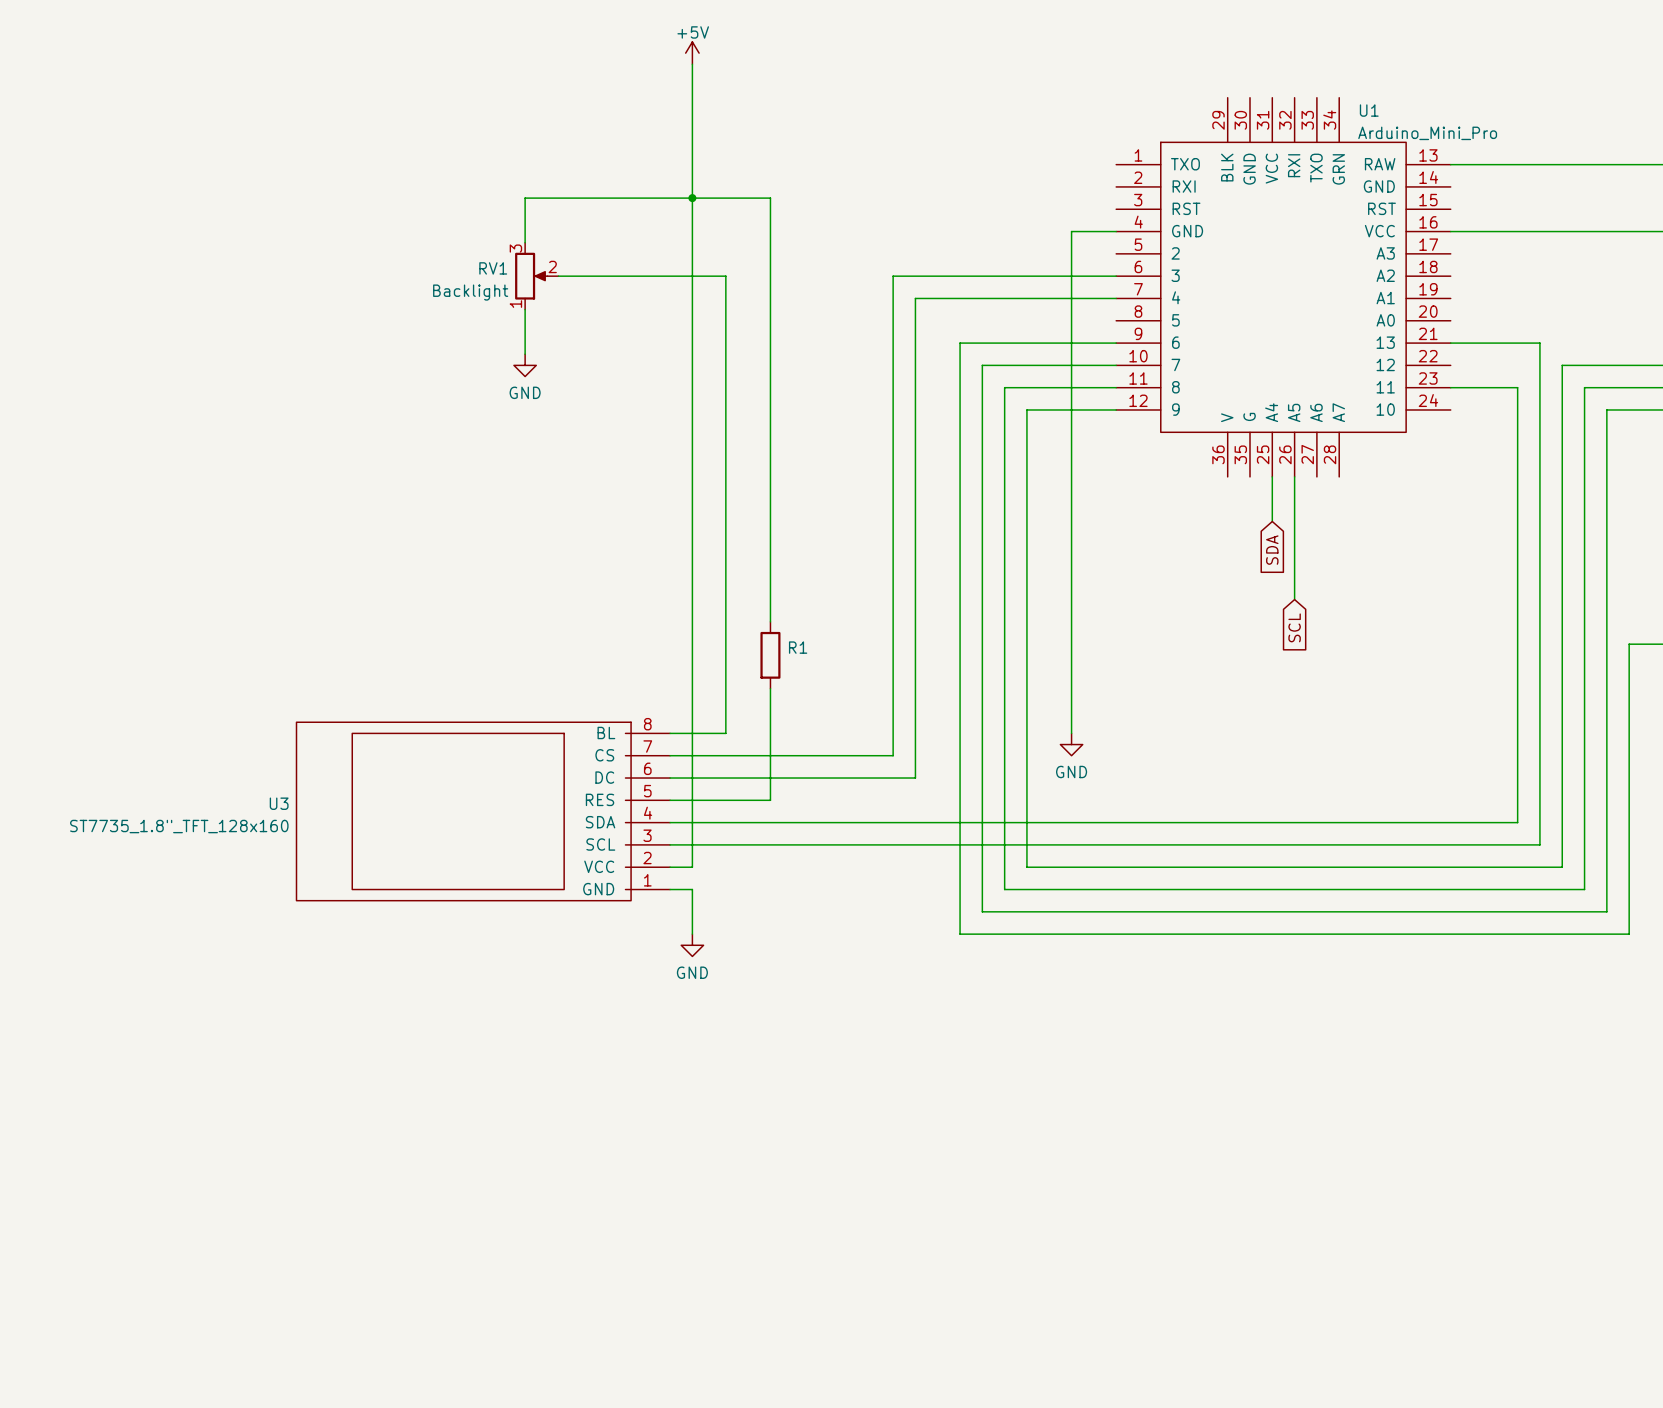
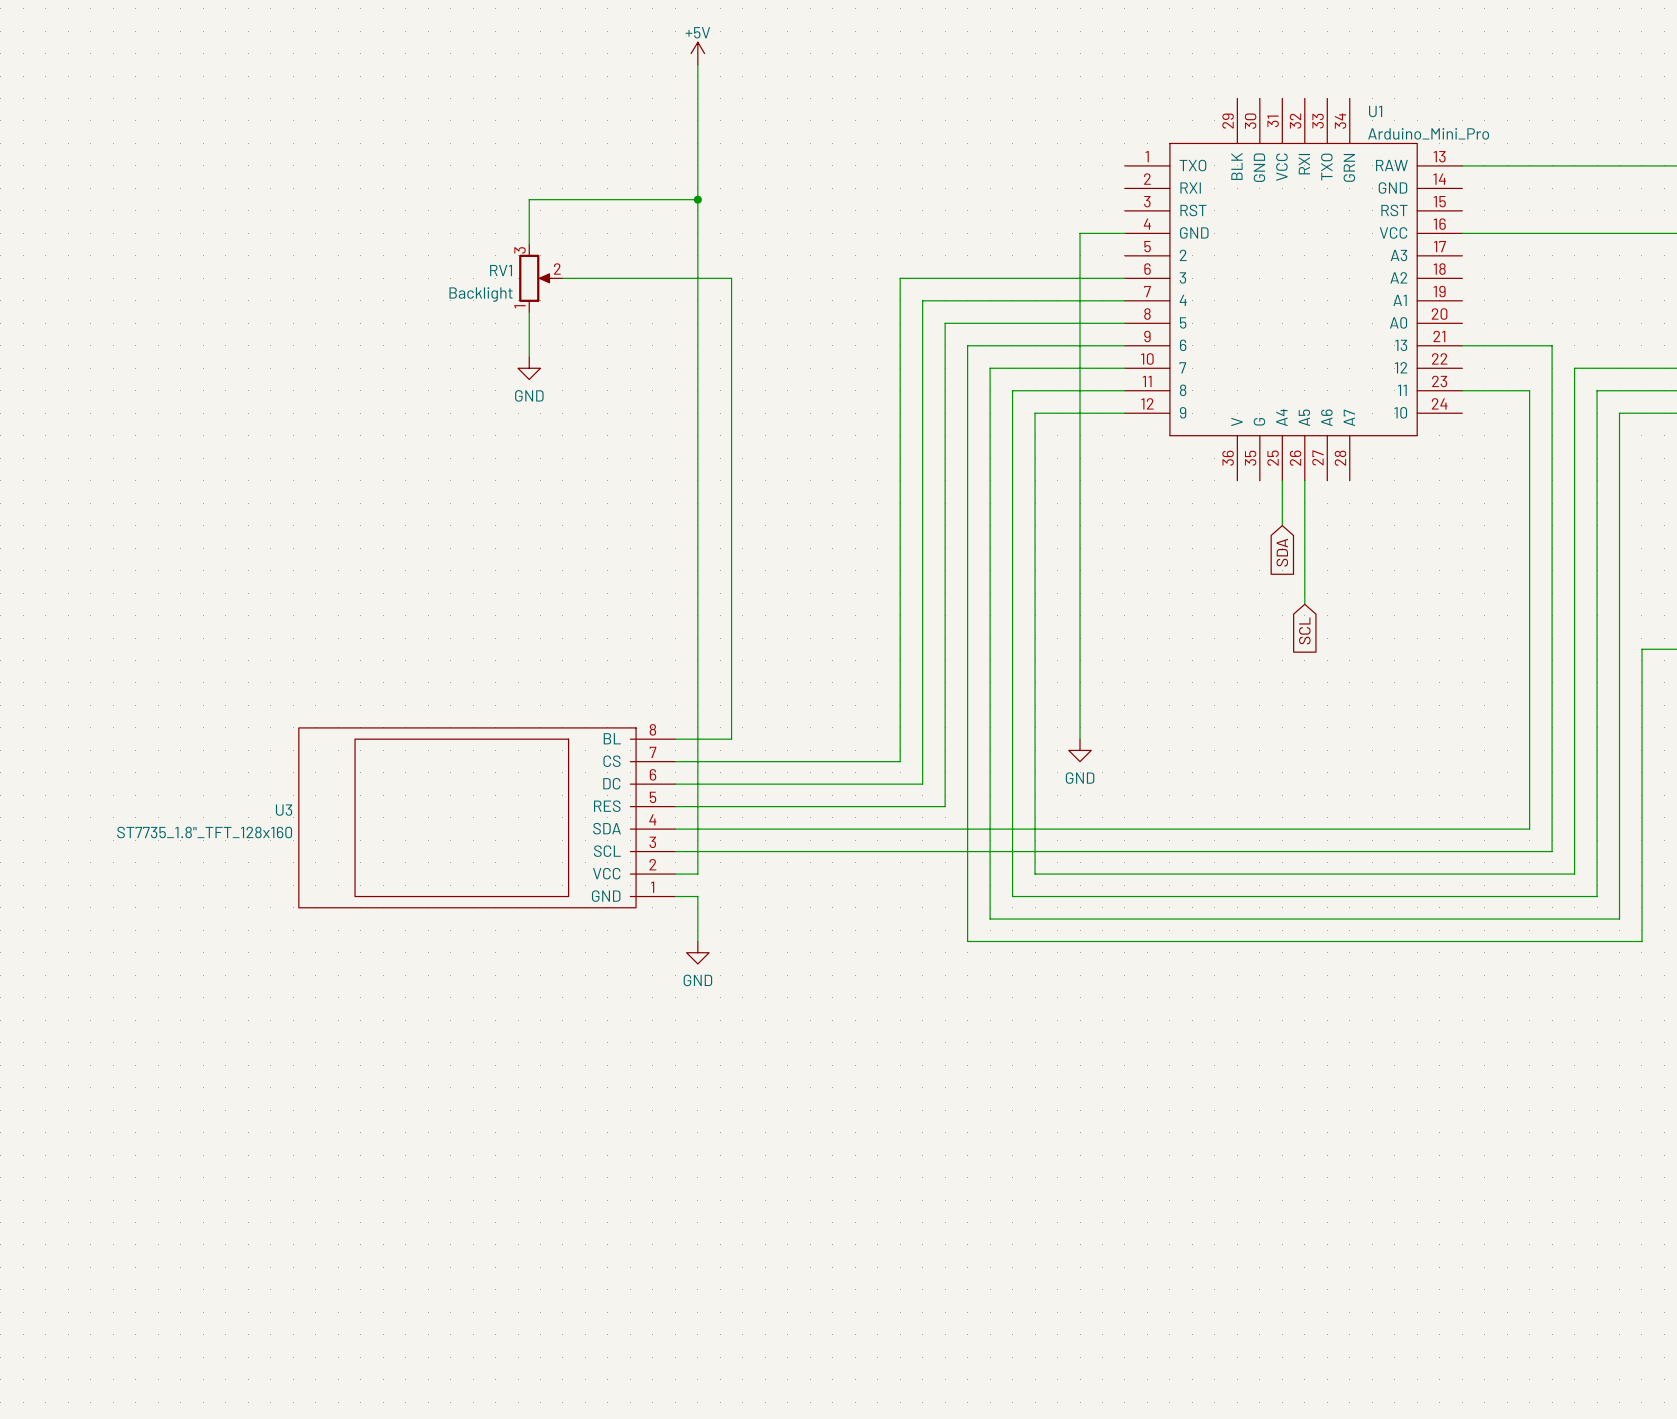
wire: (692, 198) (770, 198) (770, 621) -> none
R1: (770, 655) -> none
wire: (770, 688) (770, 800) -> (1124, 323) (945, 323) (945, 806) (776, 806)

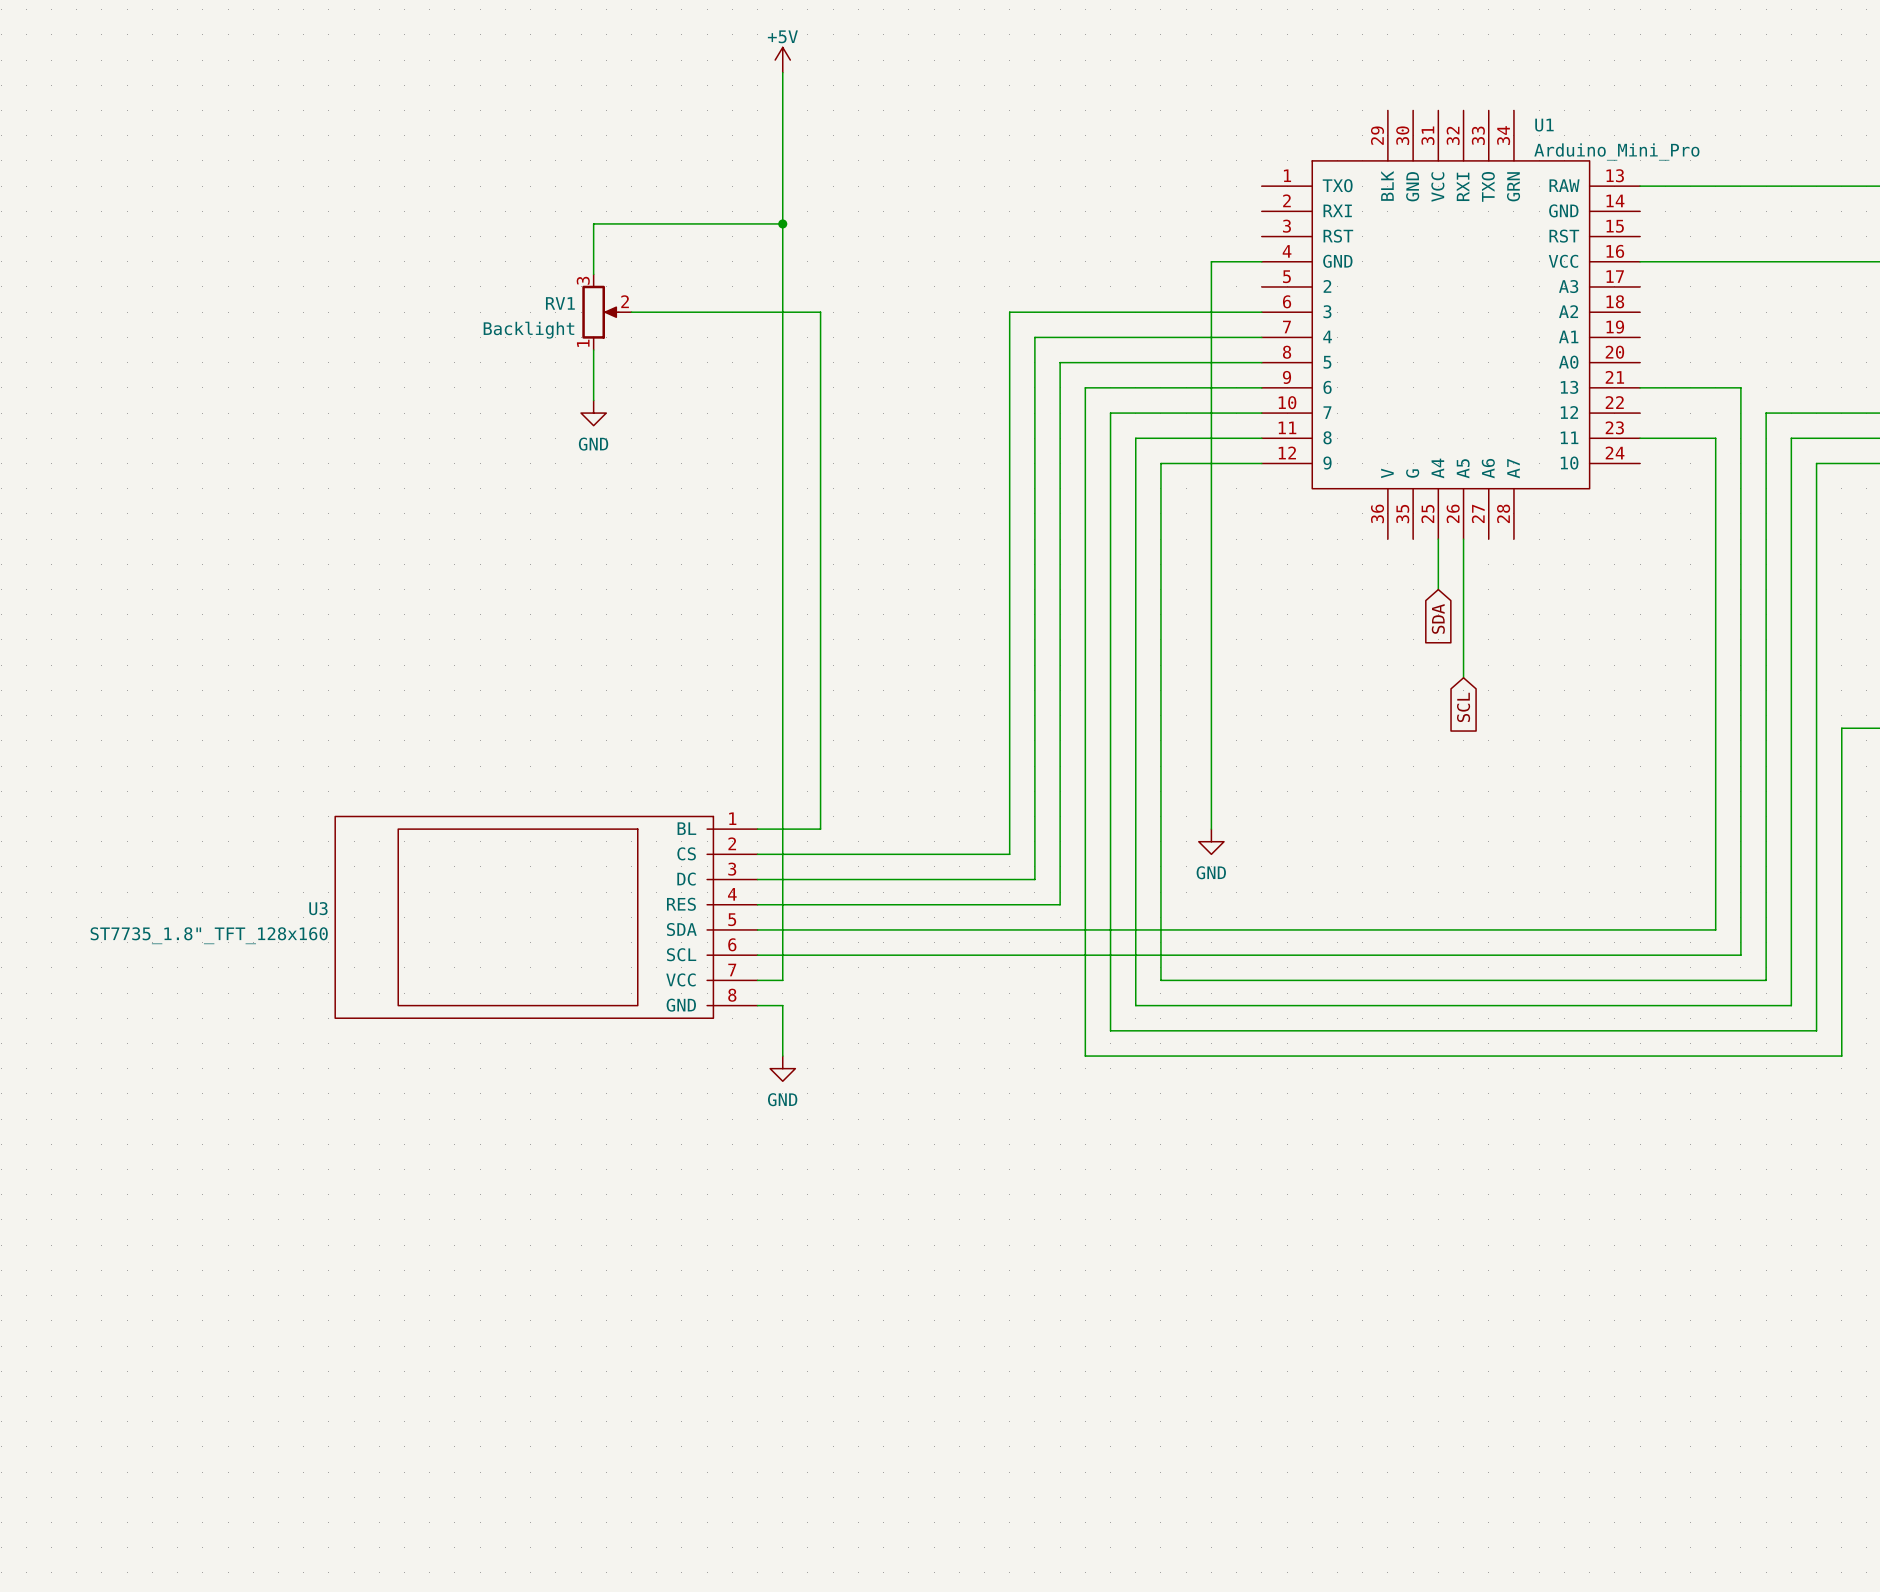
U3 pin number: 8 (652, 729) -> 1 (732, 818)
U3 pin number: 7 (653, 752) -> 2 (732, 843)
U3 pin number: 6 (653, 774) -> 3 (732, 869)
U3 pin number: 5 (653, 797) -> 4 (732, 894)
U3 pin number: 4 (652, 819) -> 5 (732, 919)
U3 pin number: 3 (652, 842) -> 6 (732, 944)
U3 pin number: 2 (652, 864) -> 7 (732, 969)
U3 pin number: 1 (652, 887) -> 8 (732, 995)

